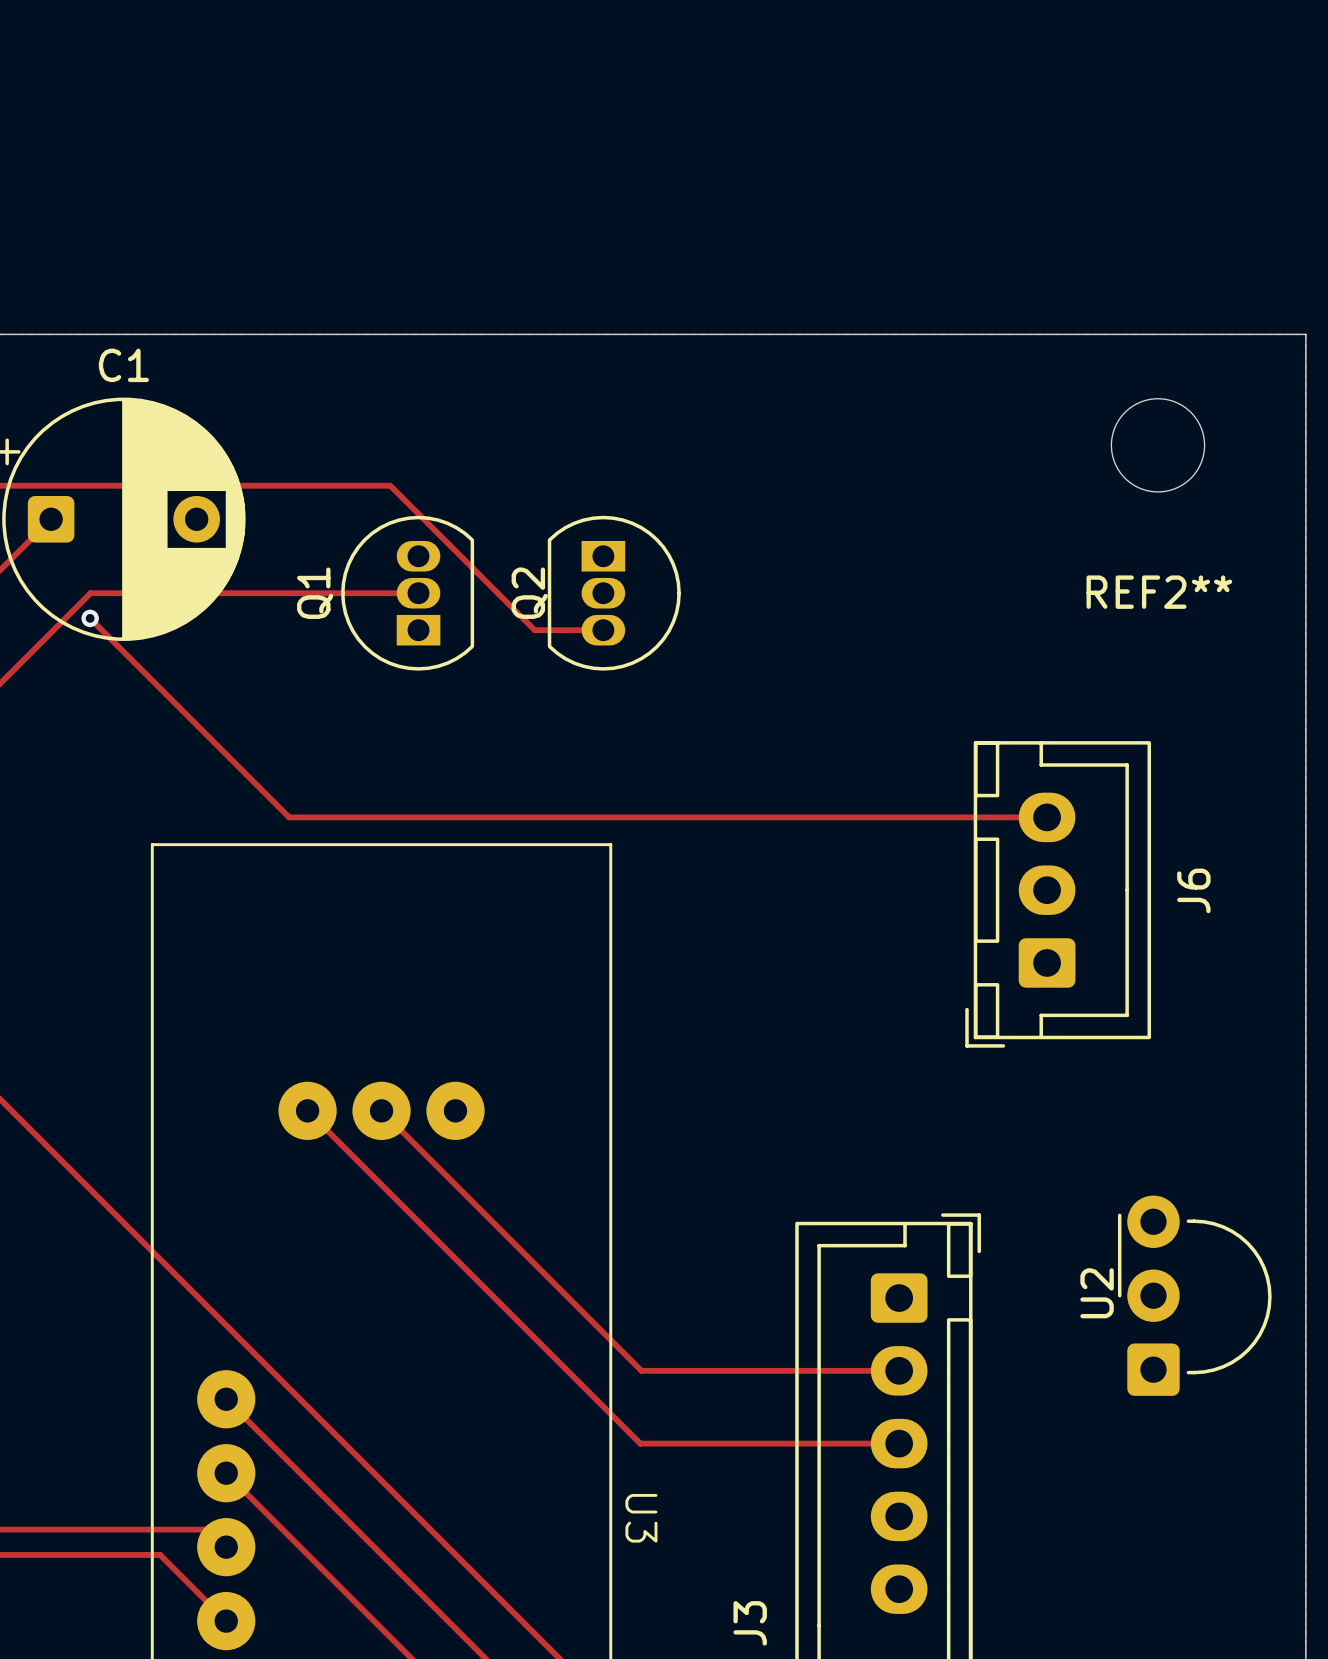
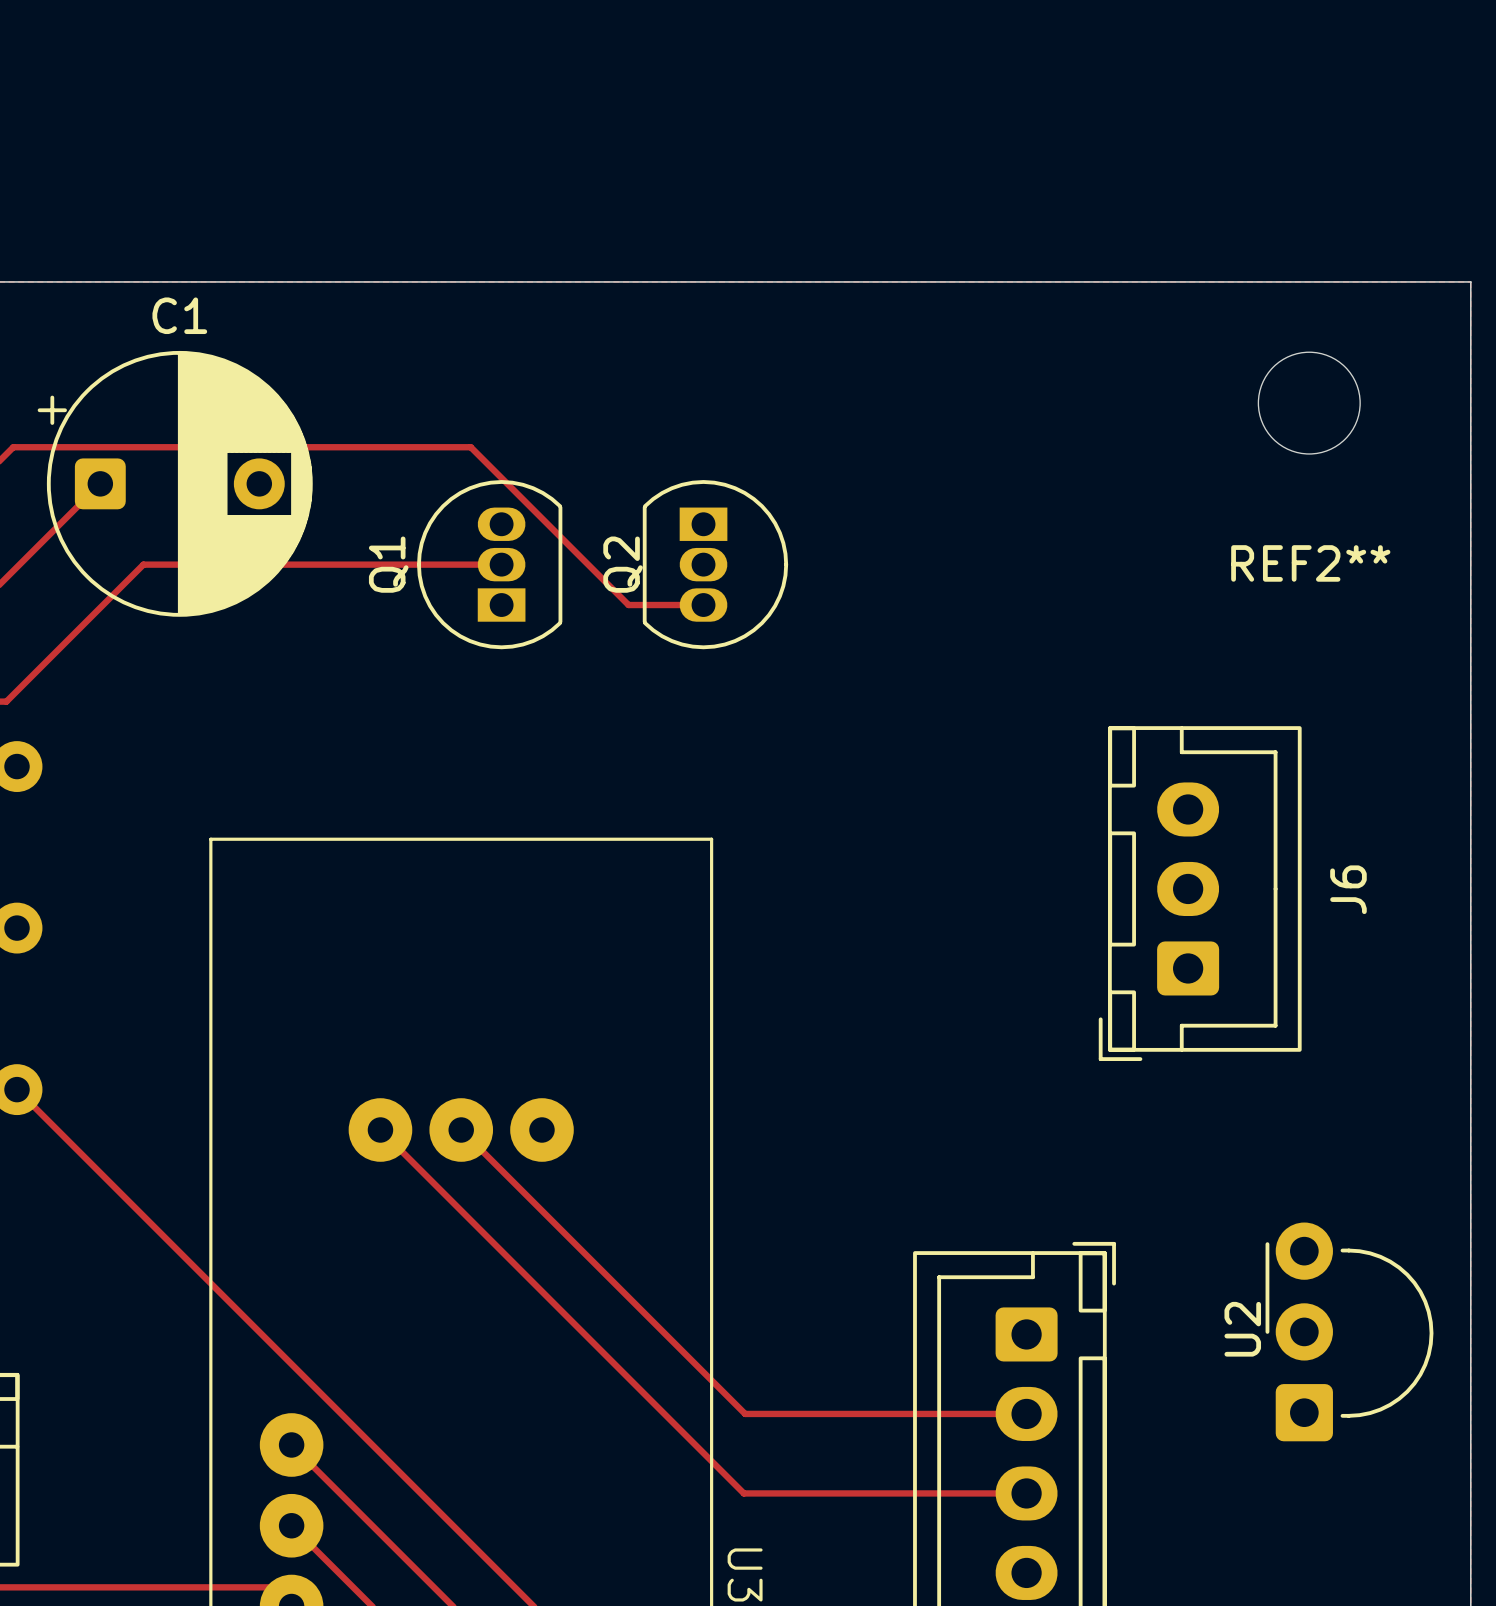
track: (90, 618) (289, 817) (1047, 817) -> none
via: (90, 618) -> none

